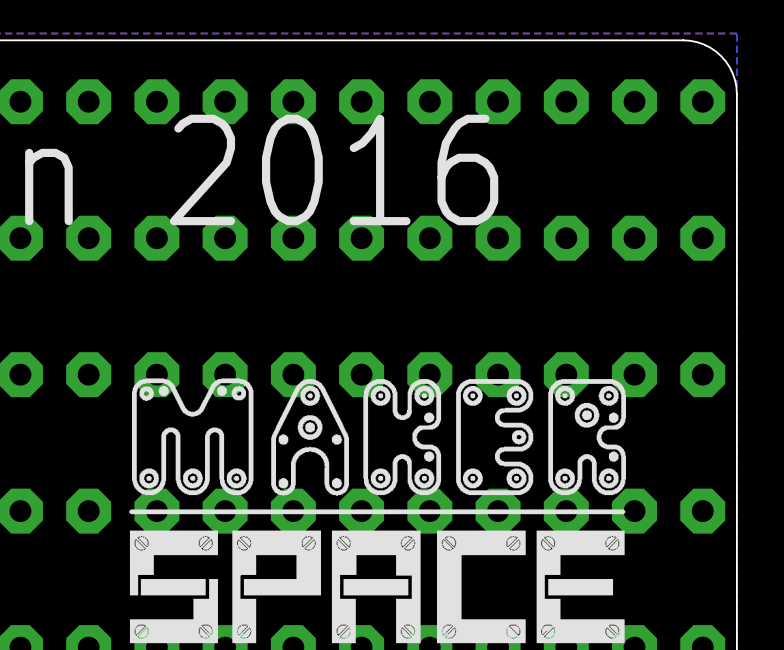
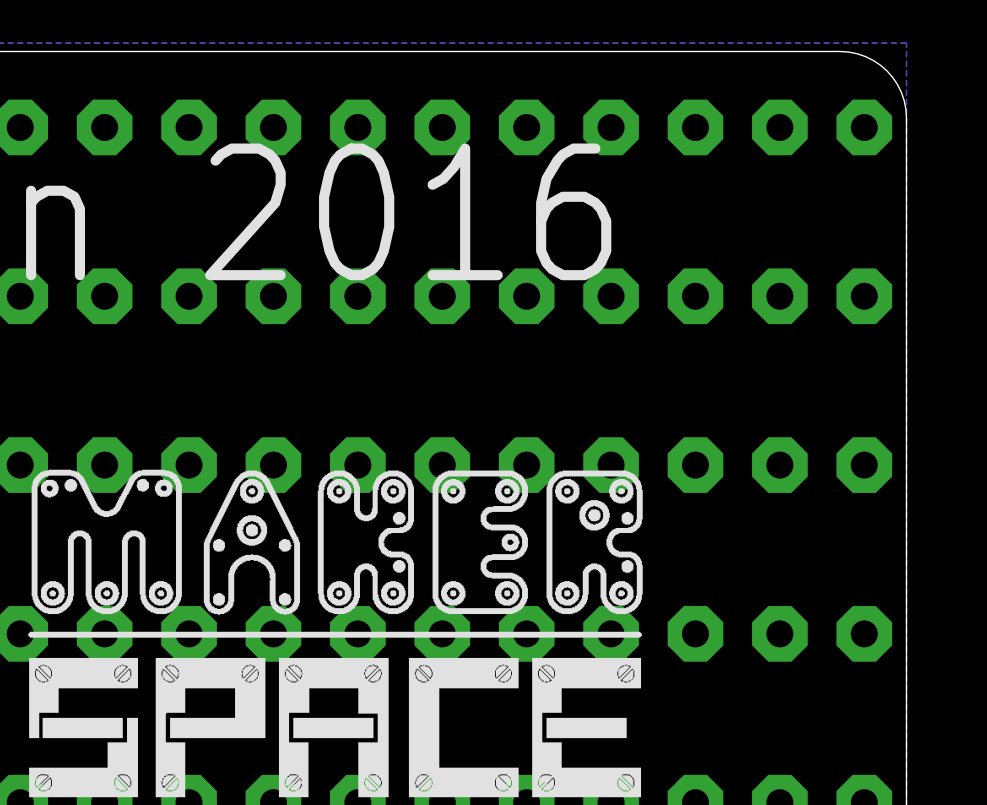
drawing position: (377, 510) -> (335, 633)

